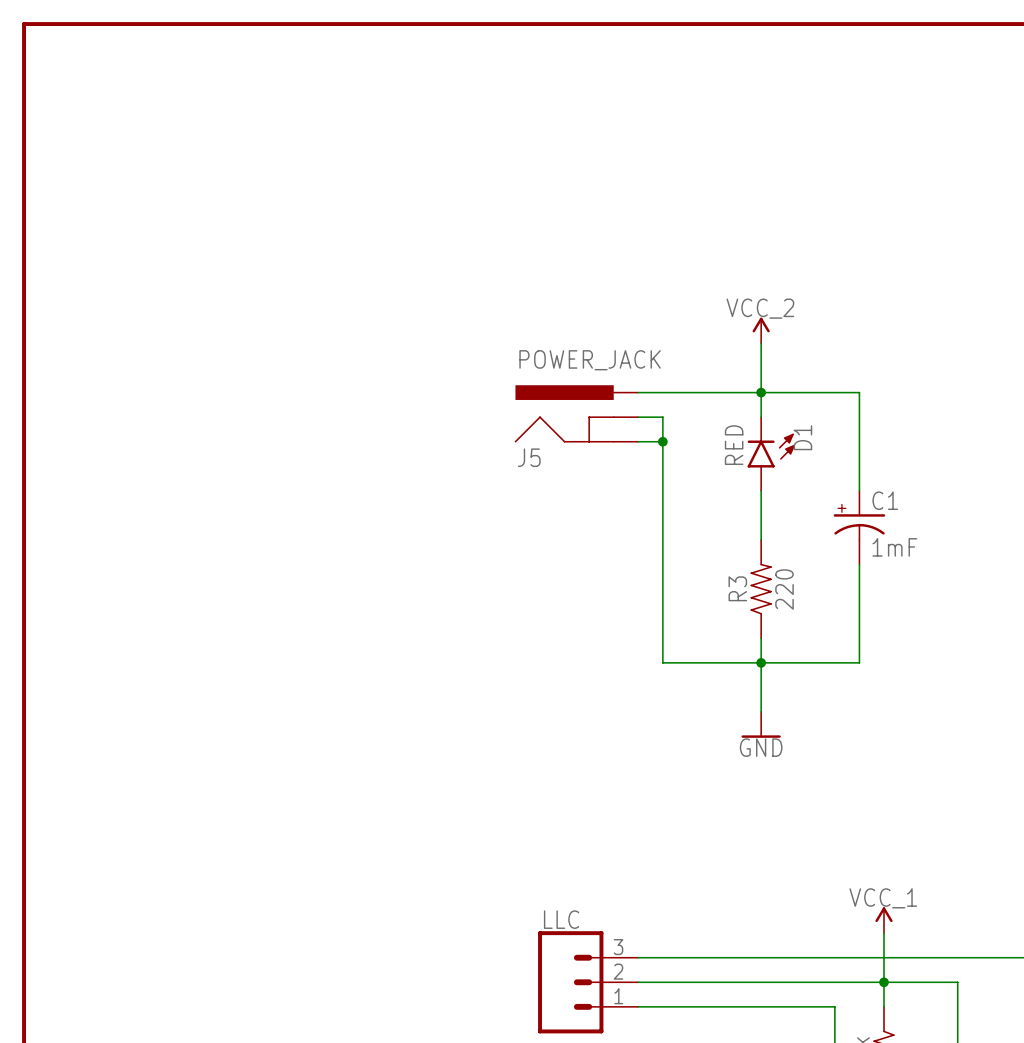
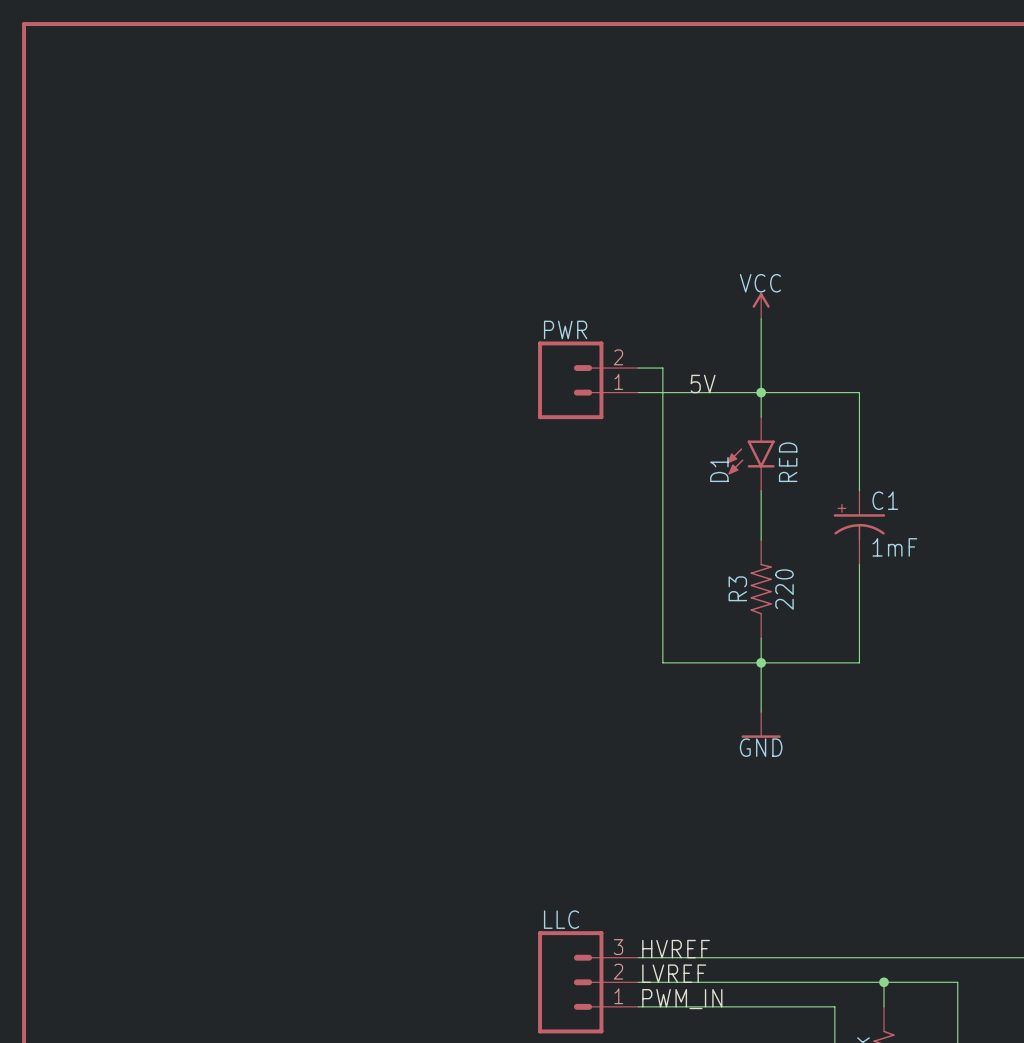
power symbol: none -> VCC (761, 305)
power symbol: VCC_2 (761, 330) -> none
PWR: none -> (588, 380)
label: none -> 5V (703, 384)
J5: POWER_JACK (576, 413) -> none
wire: (638, 417) (662, 417) -> (638, 368) (662, 368) (662, 417)
wire: (638, 441) (662, 441) -> none
junction: (662, 441) -> none
D1 rotation: 0° (771, 450) -> 180° (750, 457)
power symbol: VCC_1 (884, 920) -> none
wire: (884, 933) (884, 982) -> none
label: none -> HVREF (676, 949)
label: none -> LVREF (674, 973)
label: none -> PWM_IN (682, 999)

